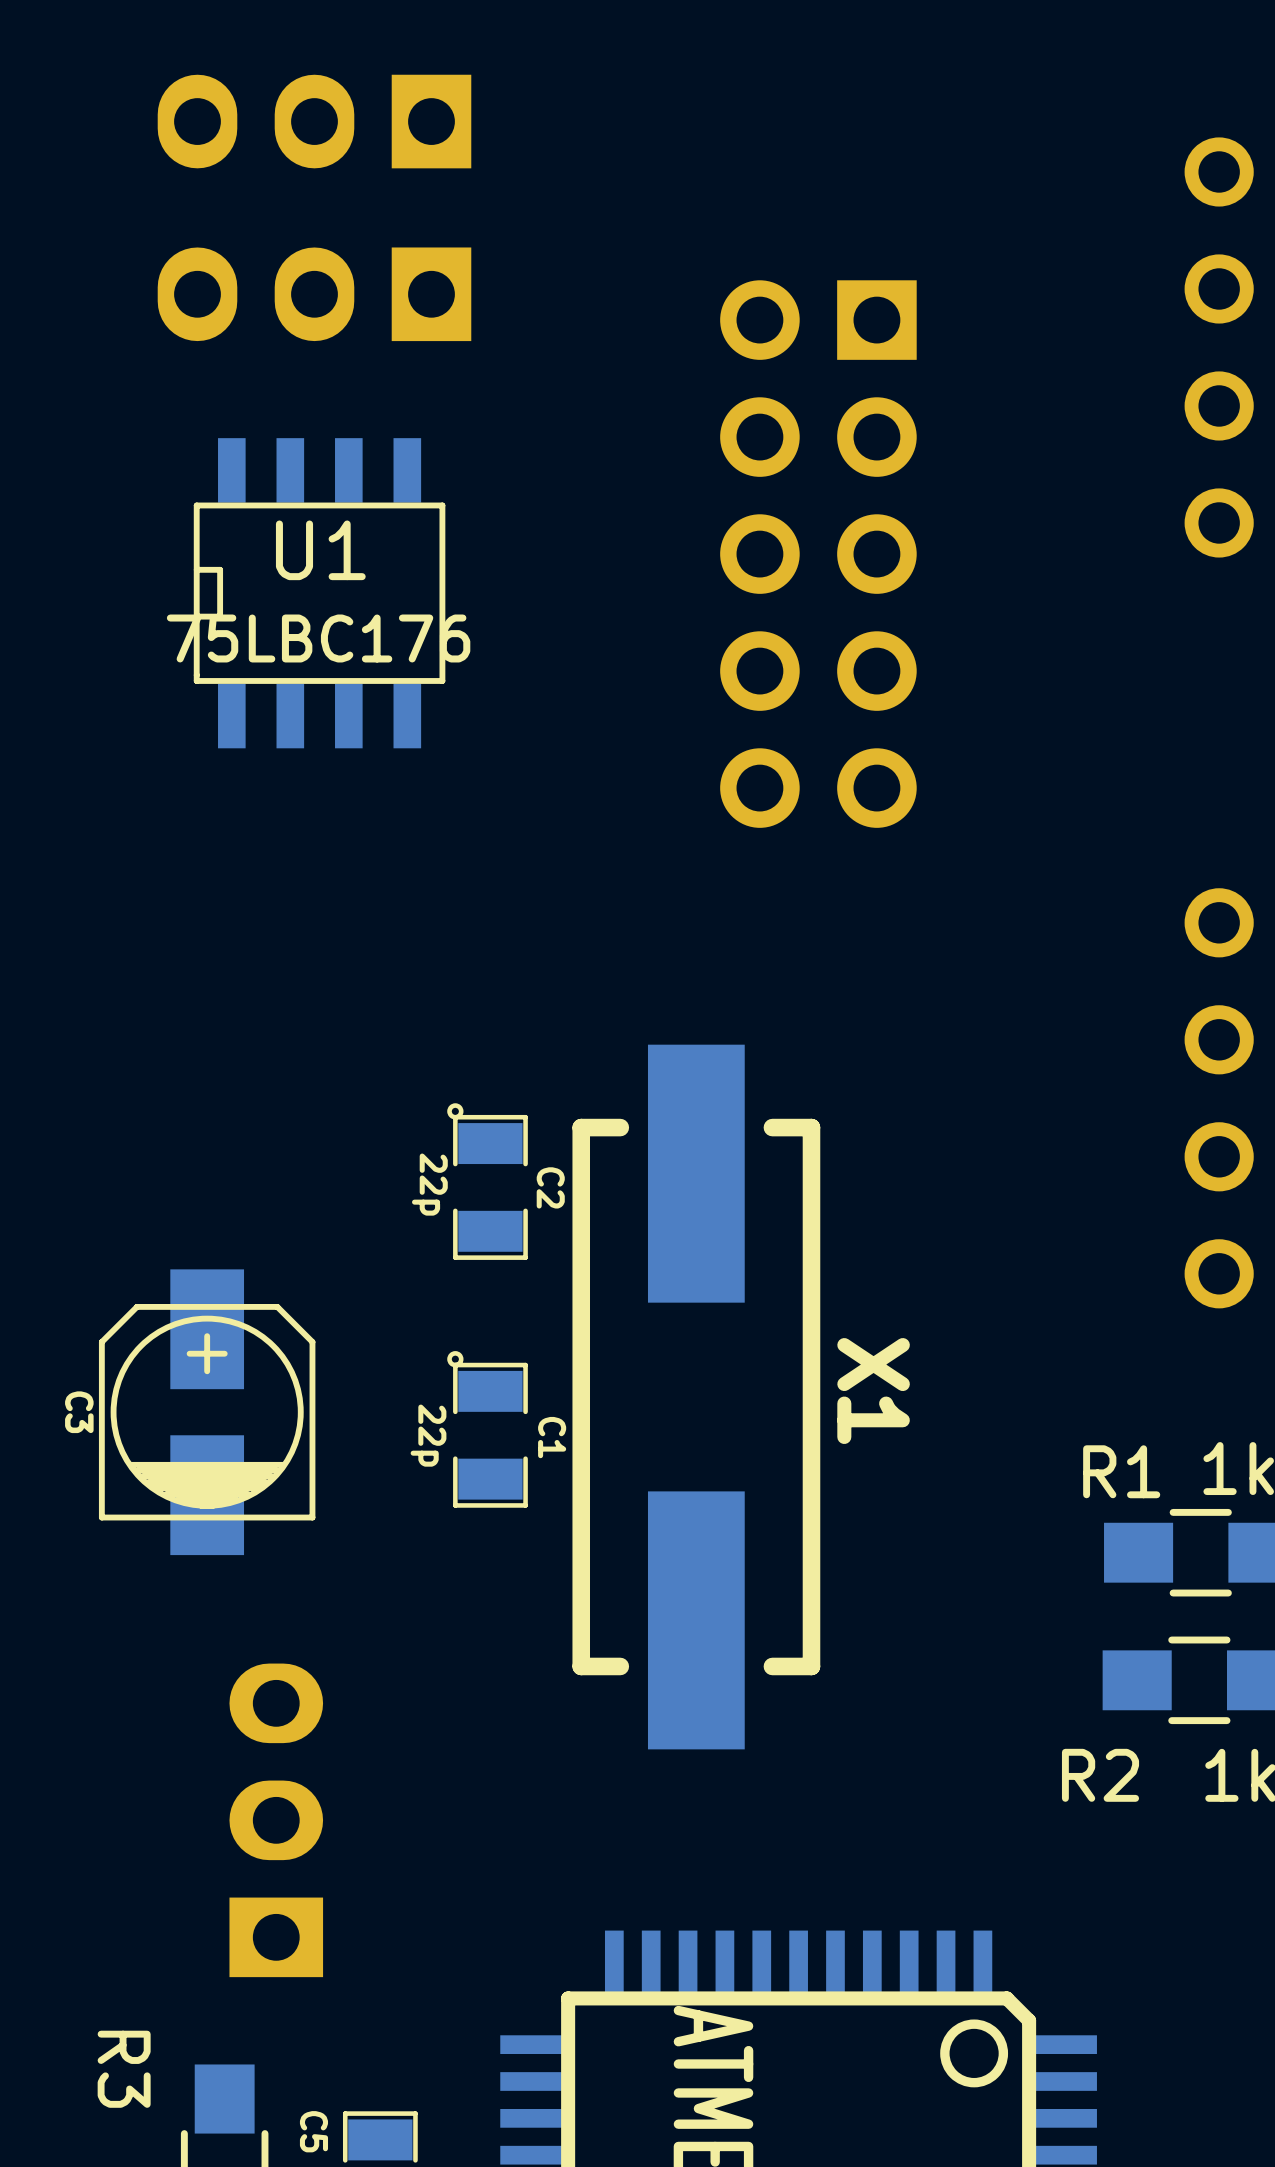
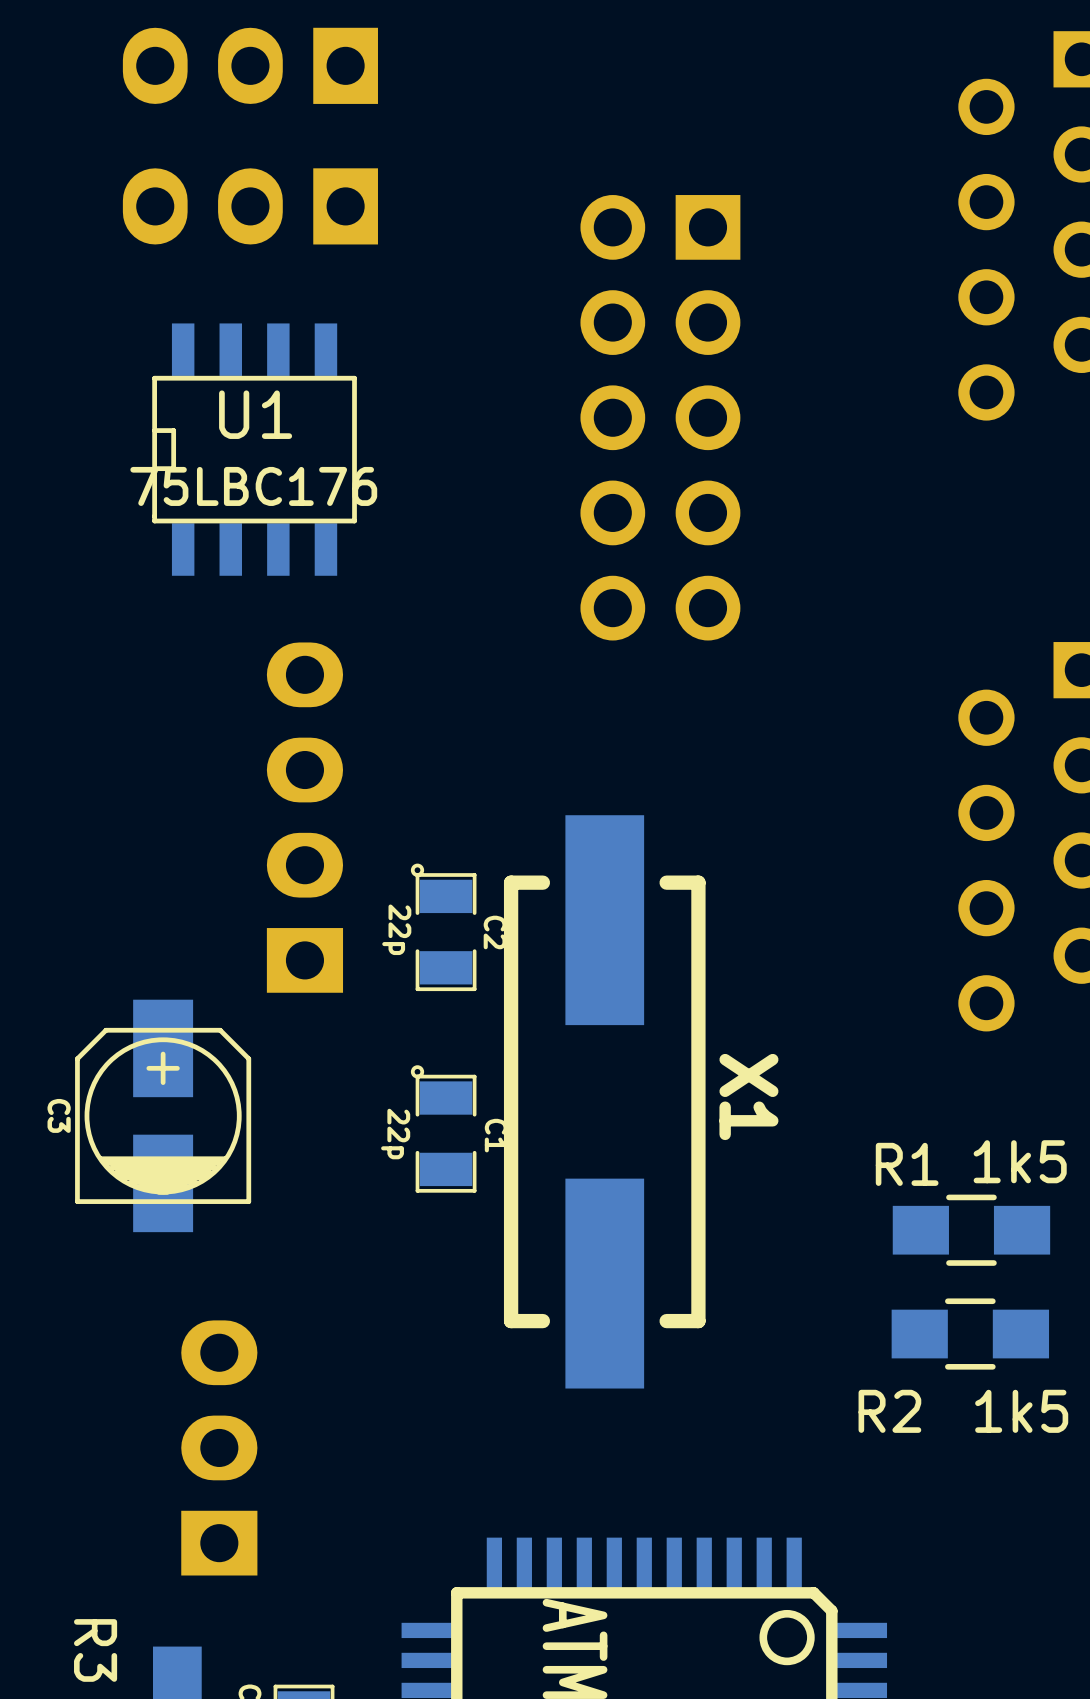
part: none -> (304, 817)
C2 position: (487, 1181) -> (443, 927)
X1 position: (696, 1397) -> (604, 1101)
C1 position: (487, 1429) -> (443, 1128)

